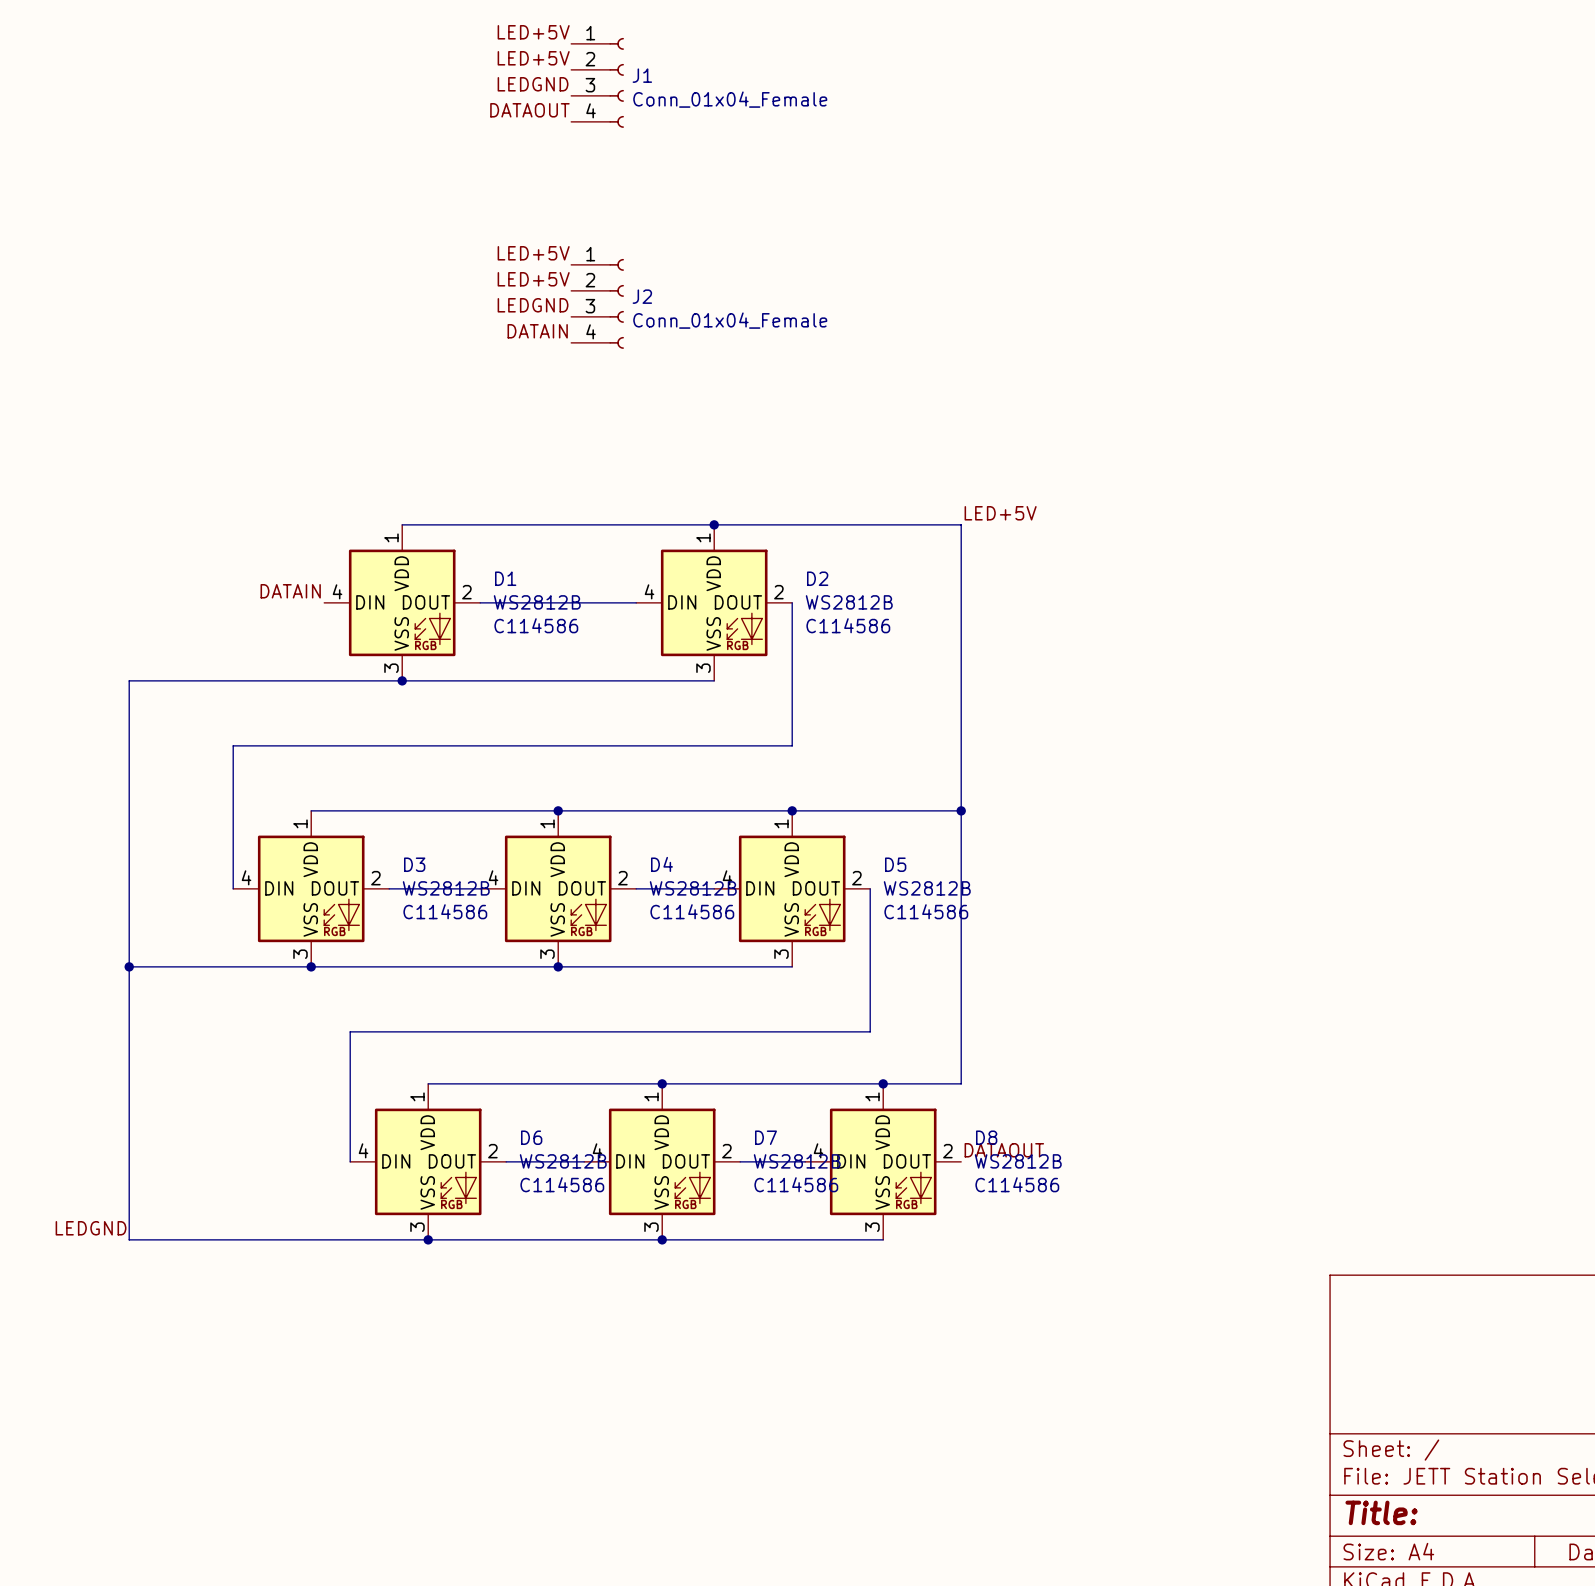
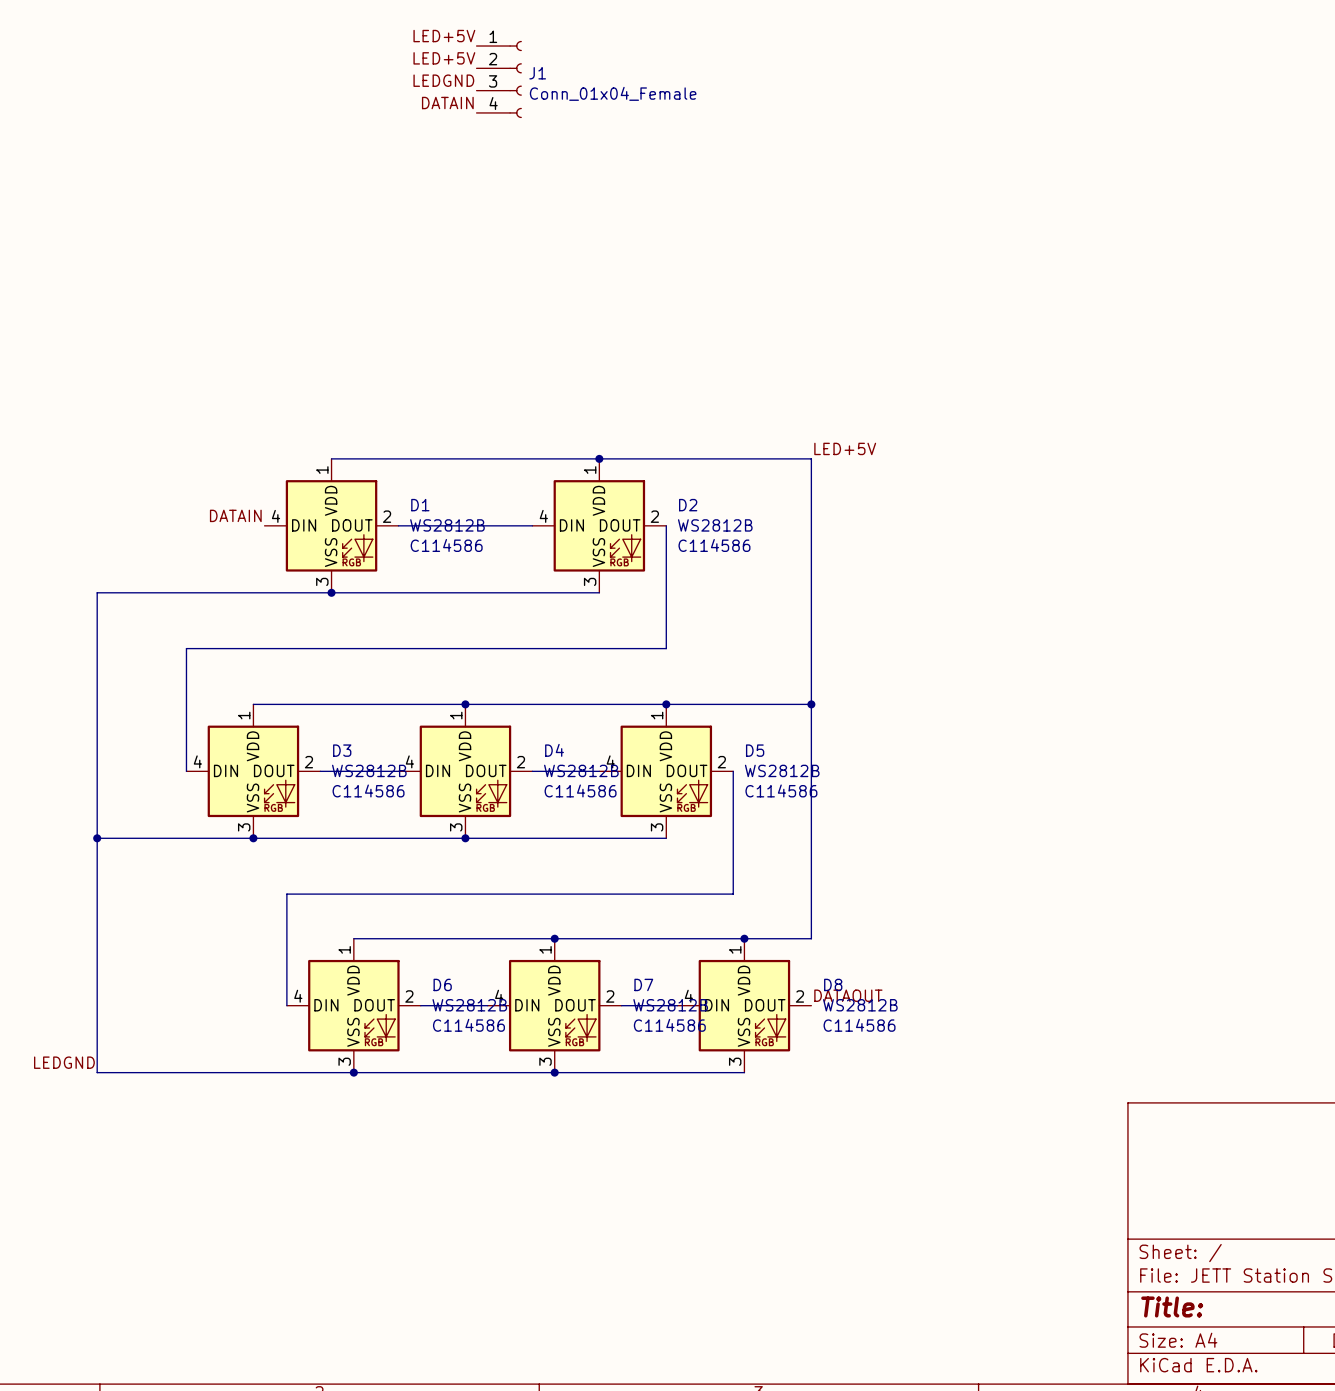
label: DATAOUT (529, 110) -> DATAIN (447, 103)
label: LED+5V (533, 253) -> none
label: LED+5V (533, 279) -> none
J2: Conn_01x04_Female (597, 303) -> none
label: LEDGND (533, 305) -> none
label: DATAIN (537, 331) -> none

